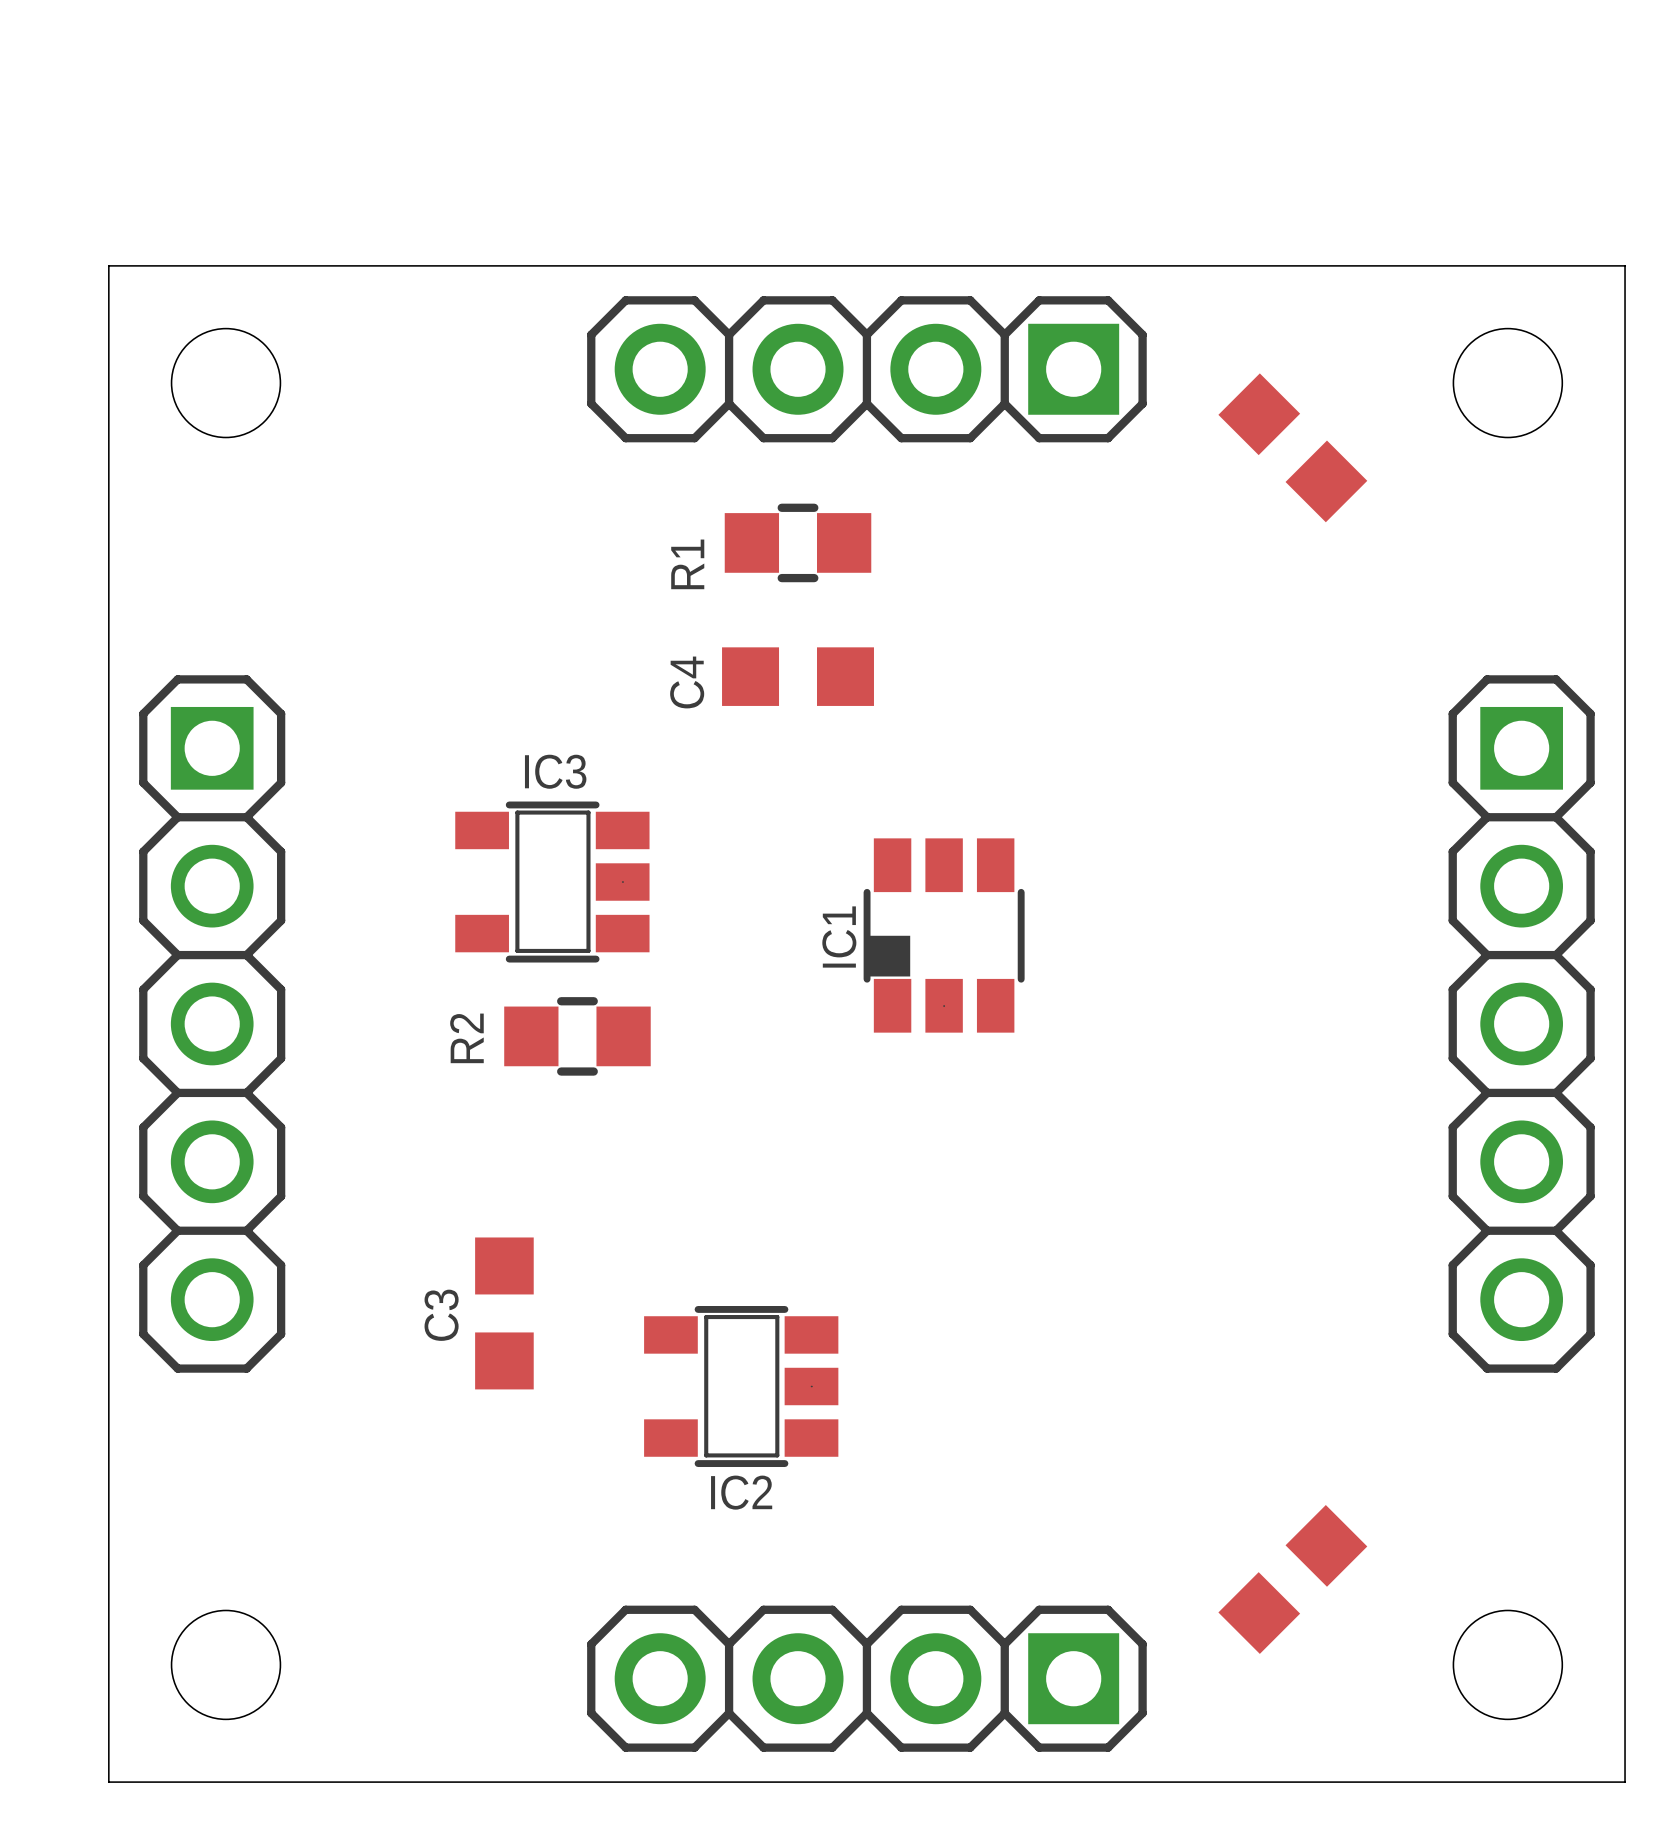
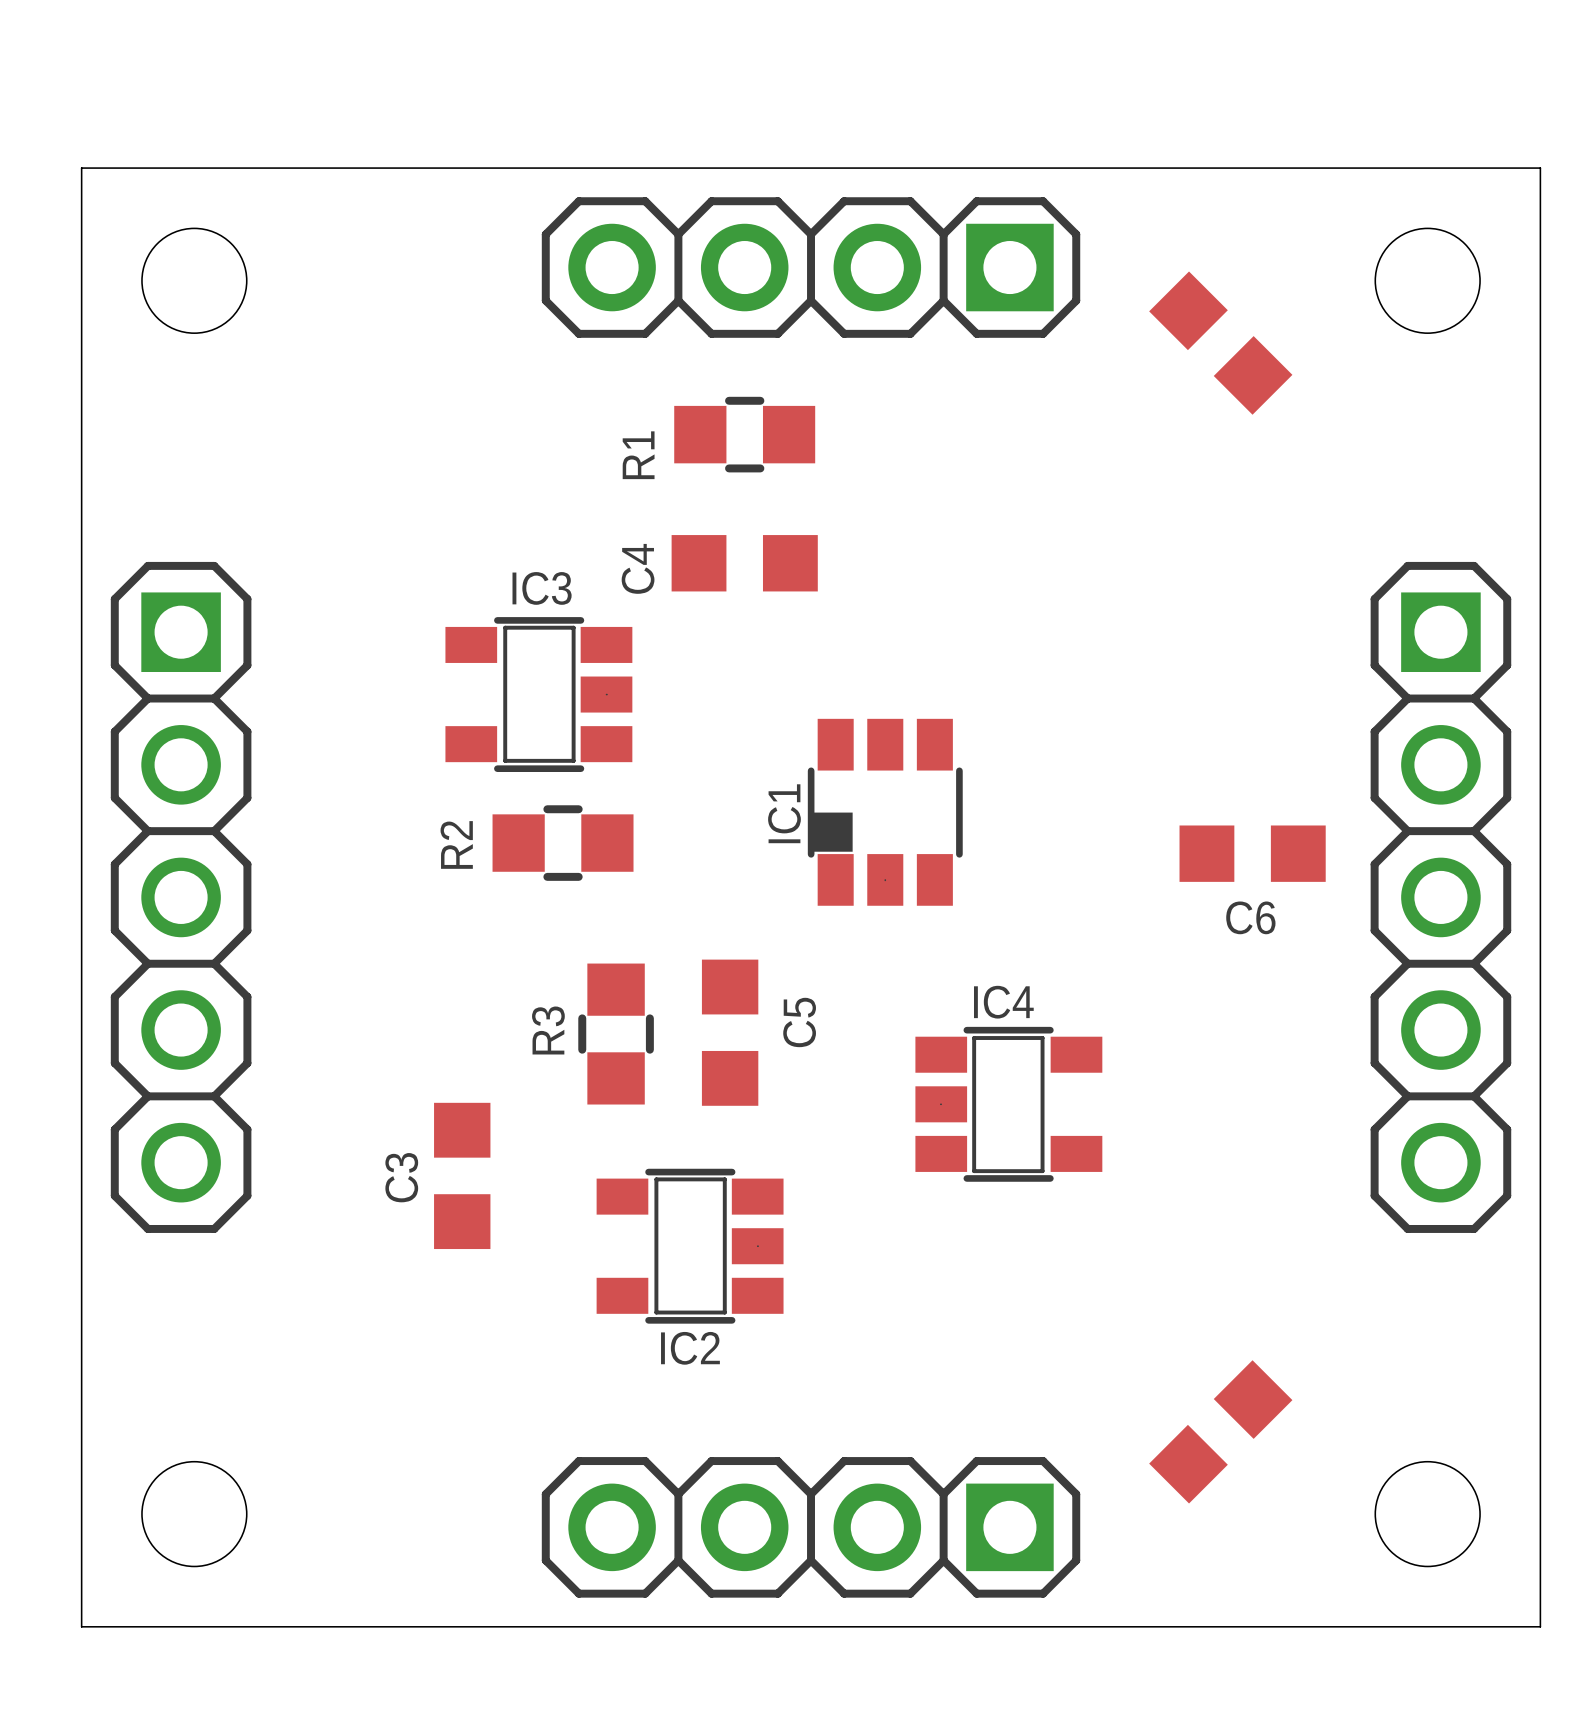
IC3 position: (552, 882) -> (538, 694)
C6: none -> (1252, 853)
R2 position: (577, 1036) -> (563, 843)
C5: none -> (730, 1032)
R3: none -> (616, 1034)
IC4: none -> (1008, 1104)

